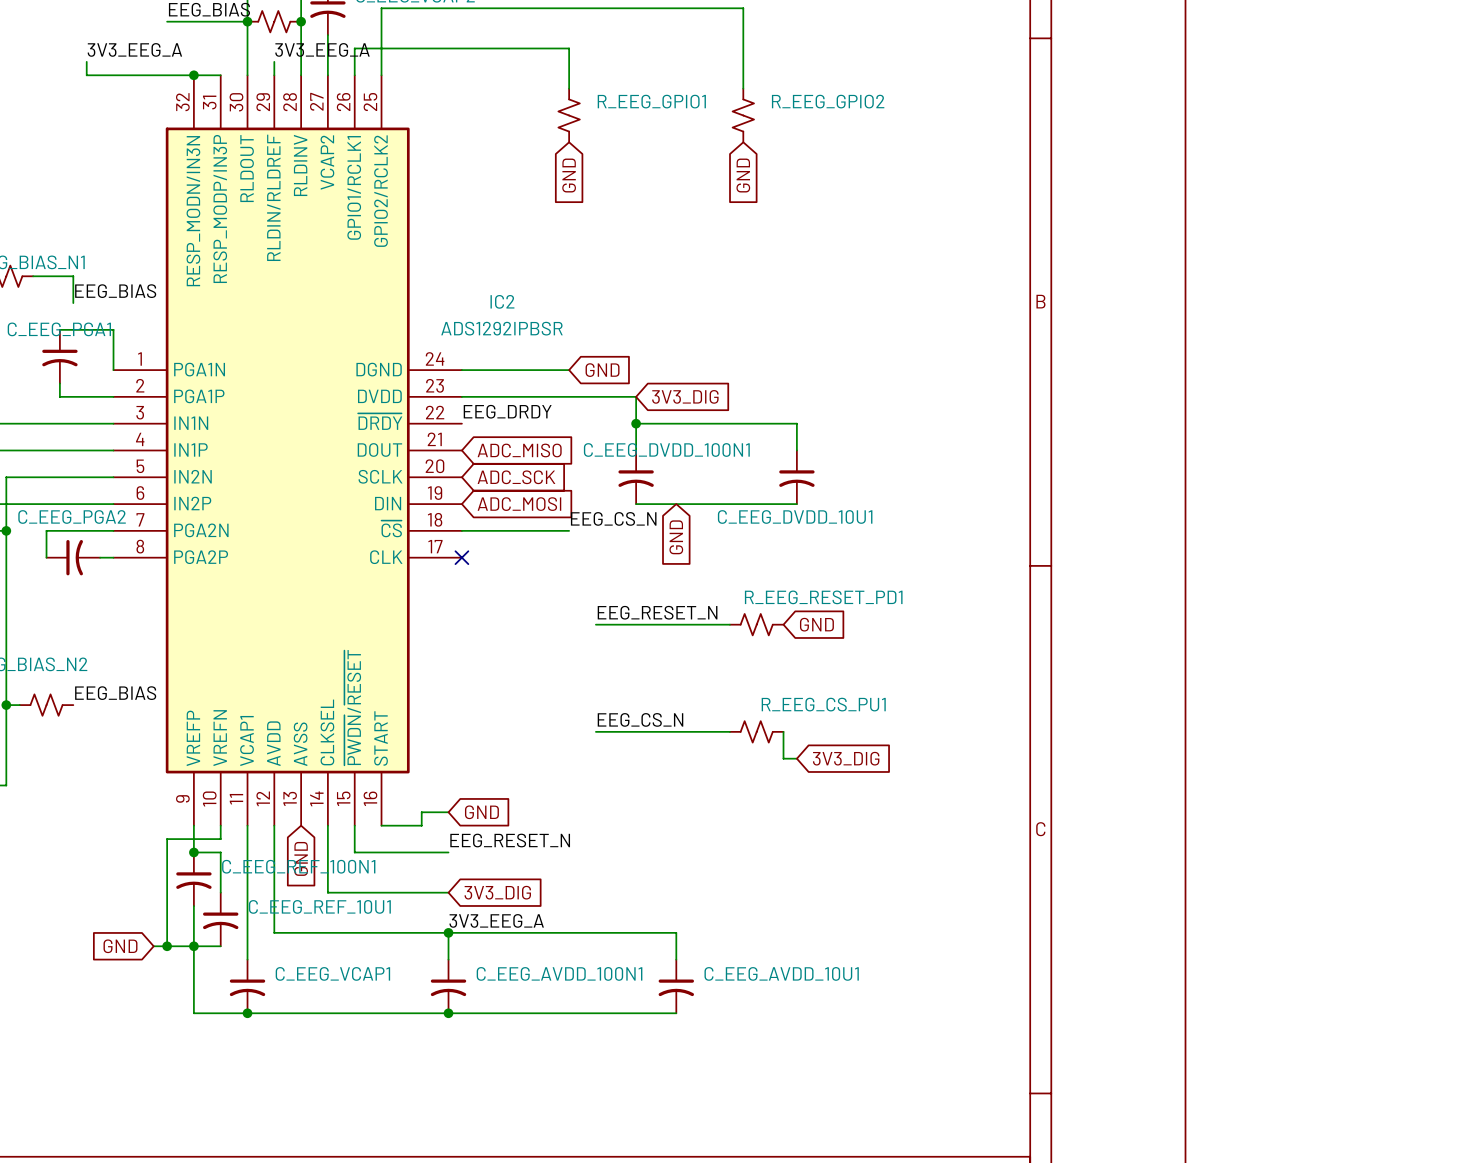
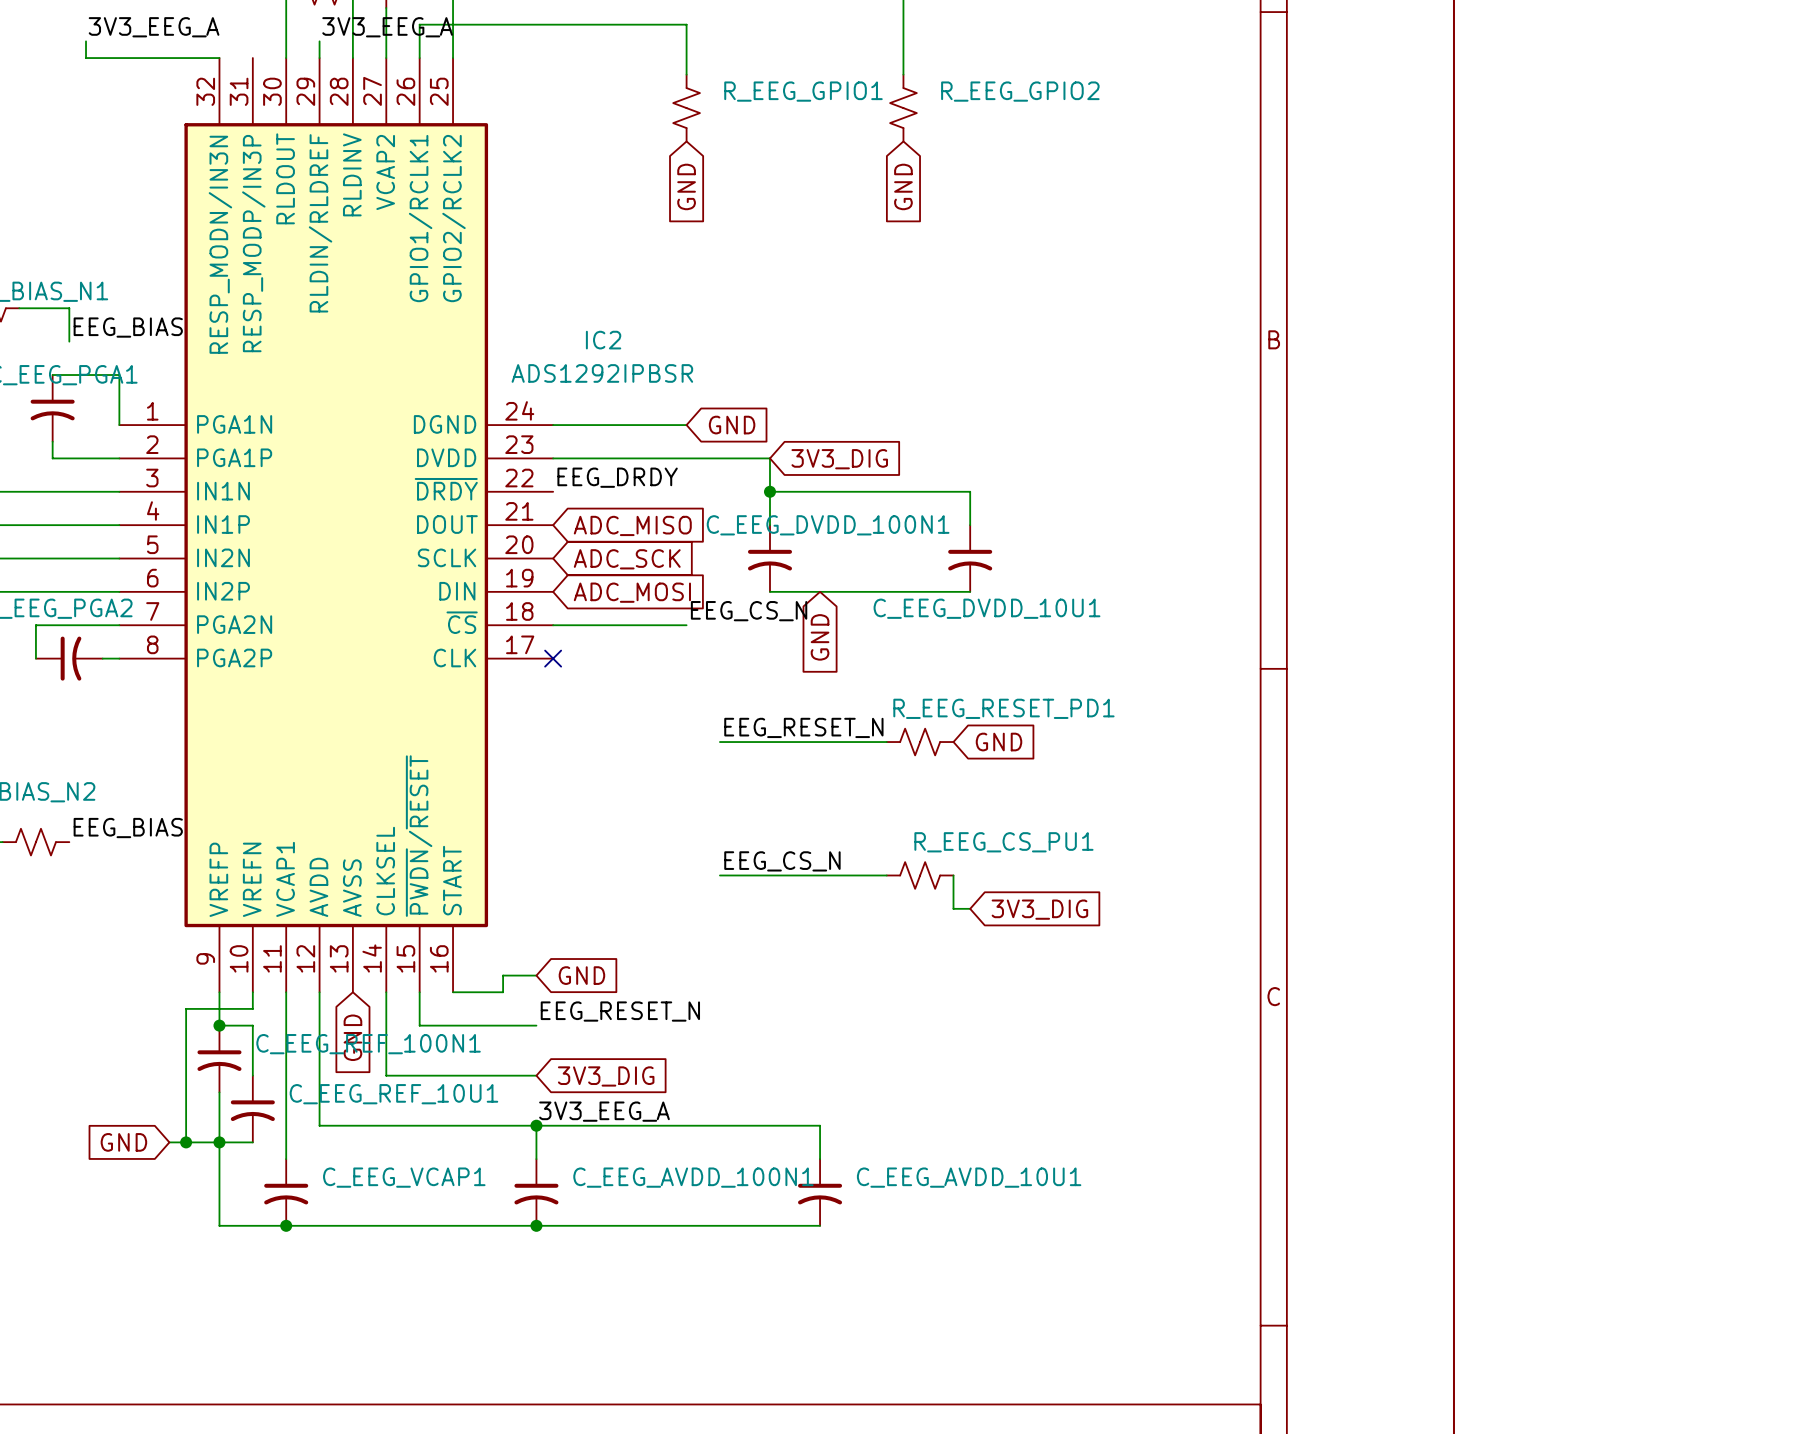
wire: (193, 75) (220, 75) -> none
junction: (193, 75) -> none

